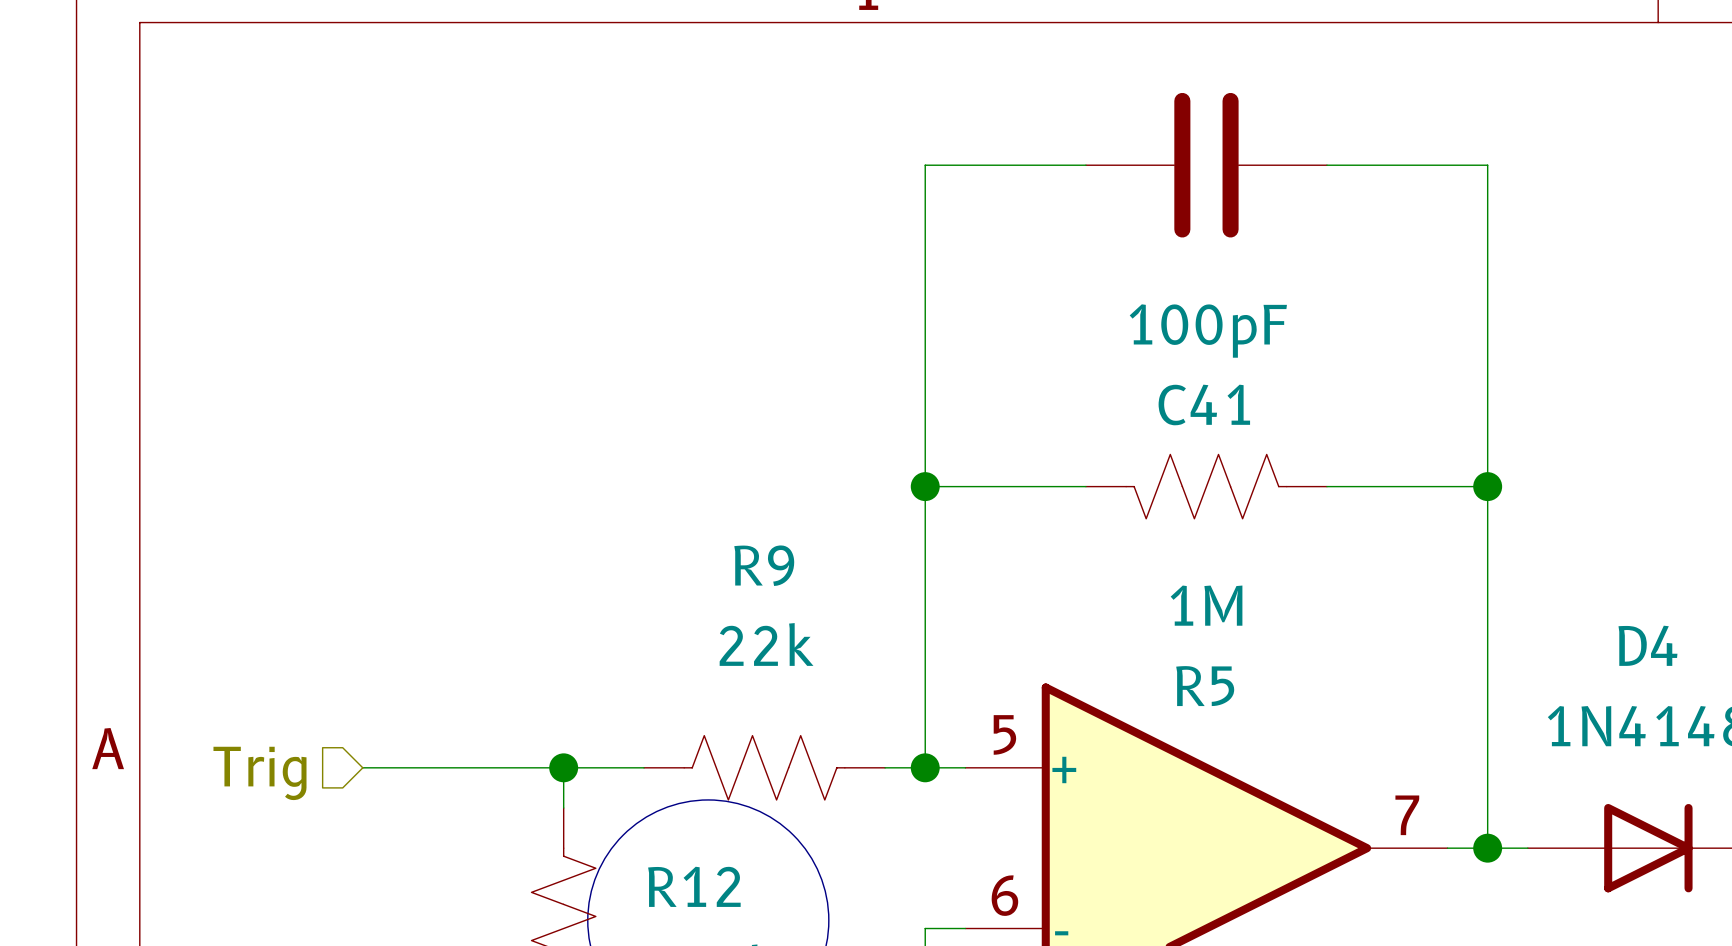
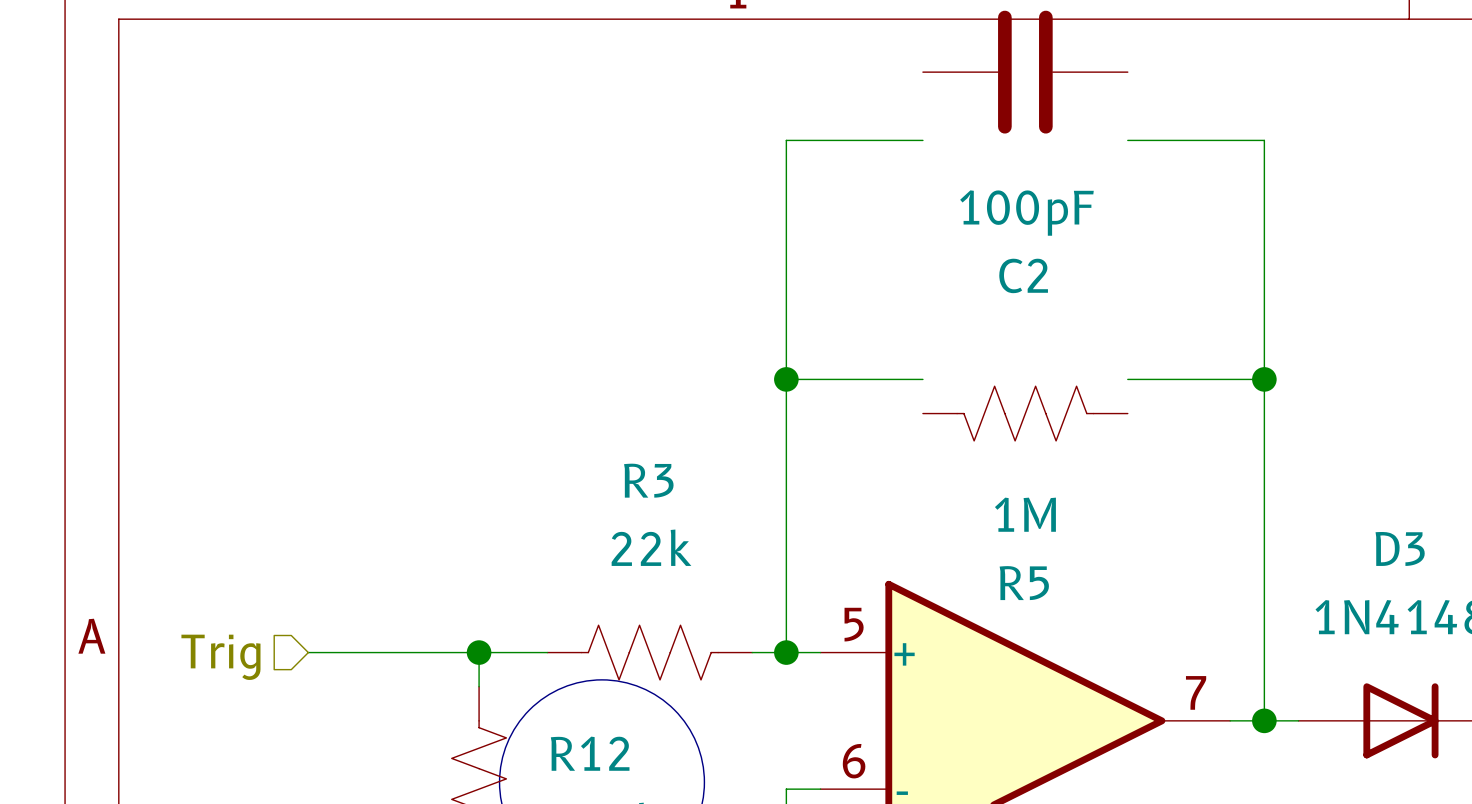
C2: none -> 100pF (1025, 72)
C41: 100pF (1206, 165) -> none
wire: (925, 486) (1085, 486) -> (786, 379) (922, 379)
junction position: (925, 486) -> (786, 379)
wire: (1326, 486) (1487, 486) -> (1127, 379) (1264, 379)
junction position: (1487, 486) -> (1264, 379)
R9 name: R9 (764, 565) -> R3 (648, 480)
D4 name: D4 (1647, 645) -> D3 (1400, 548)

